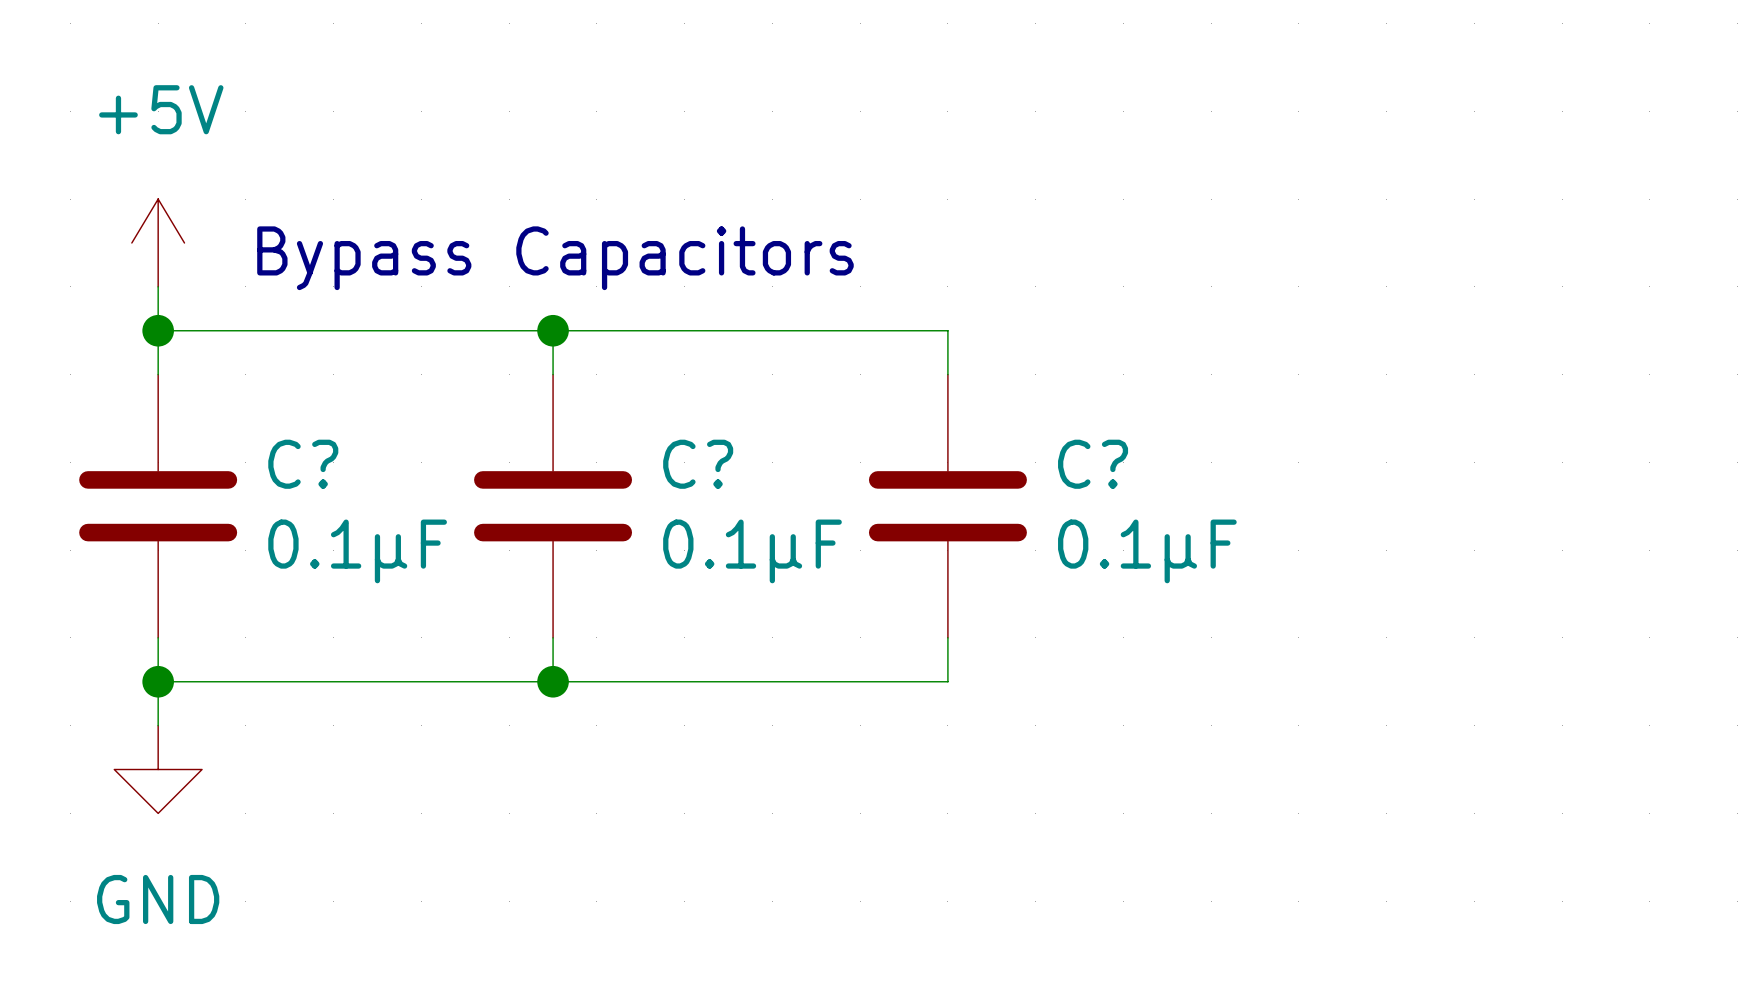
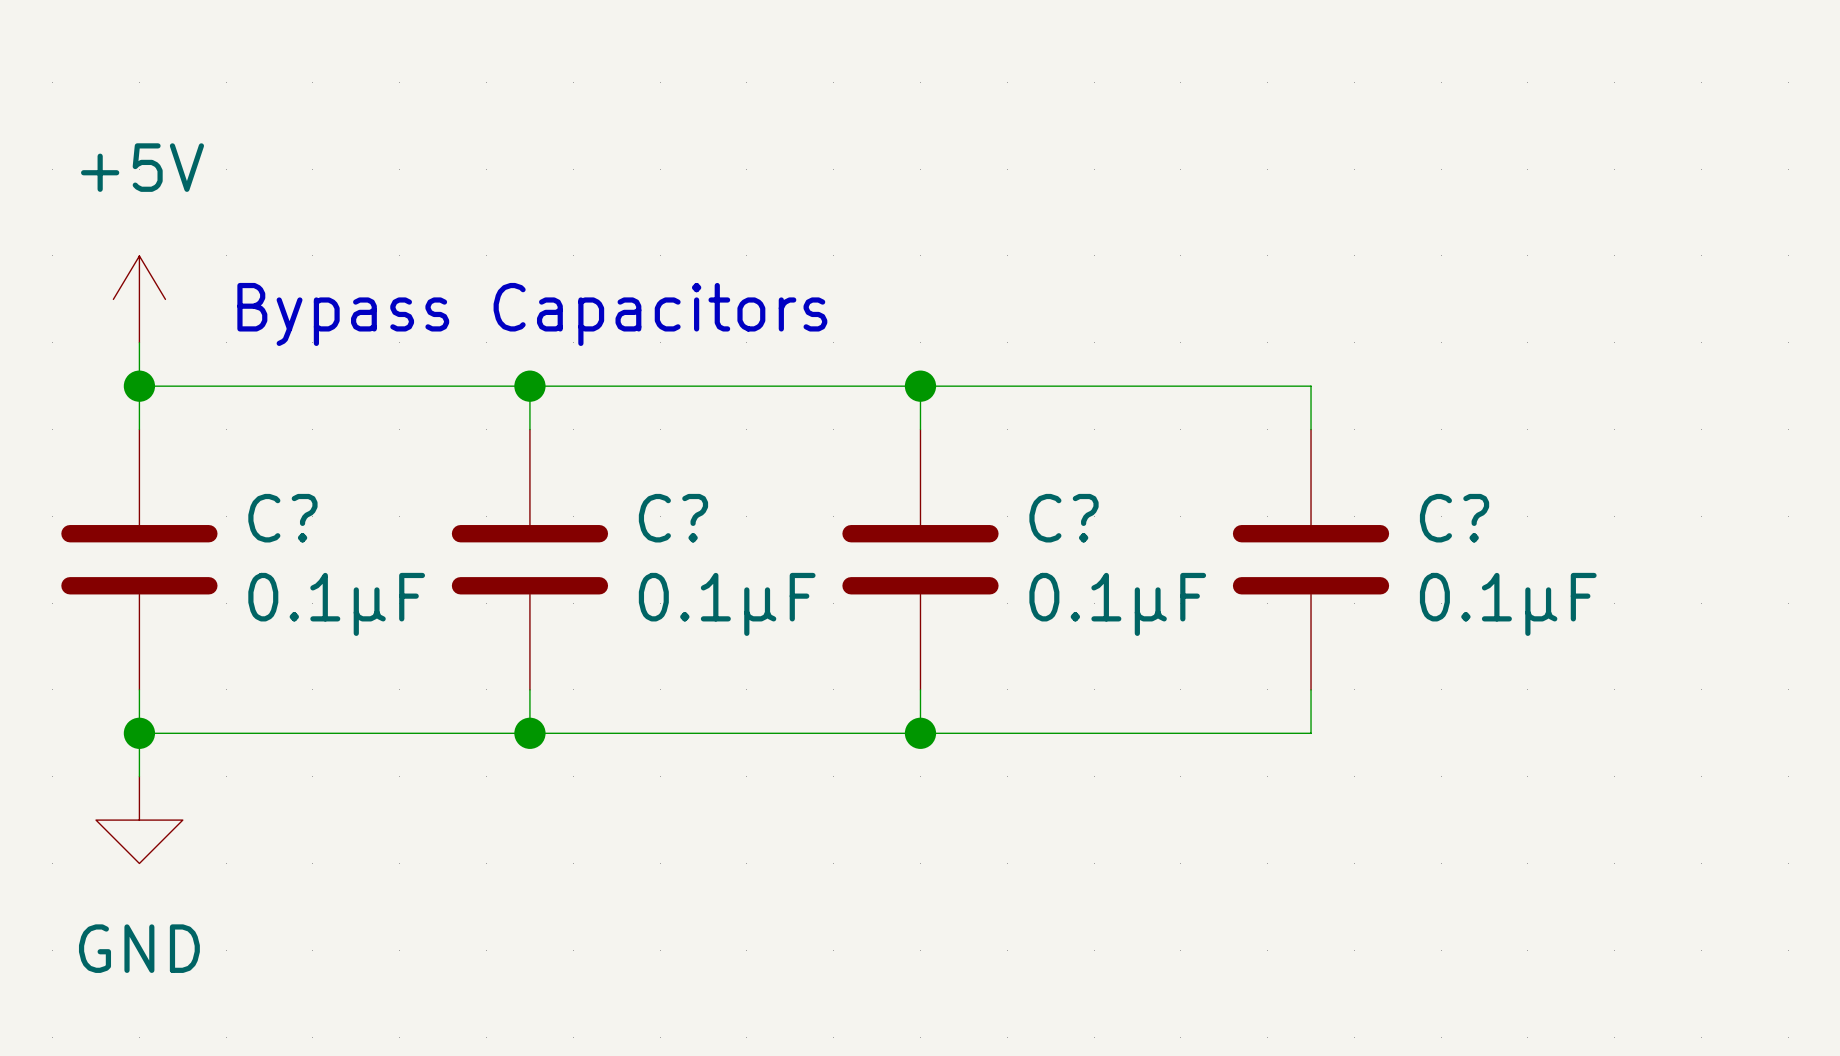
wire: none -> (920, 386) (1311, 386) (1311, 429)
junction: none -> (920, 386)
C?: none -> 0.1µF (1311, 559)
wire: none -> (1311, 689) (1311, 733) (920, 733)
junction: none -> (920, 733)

